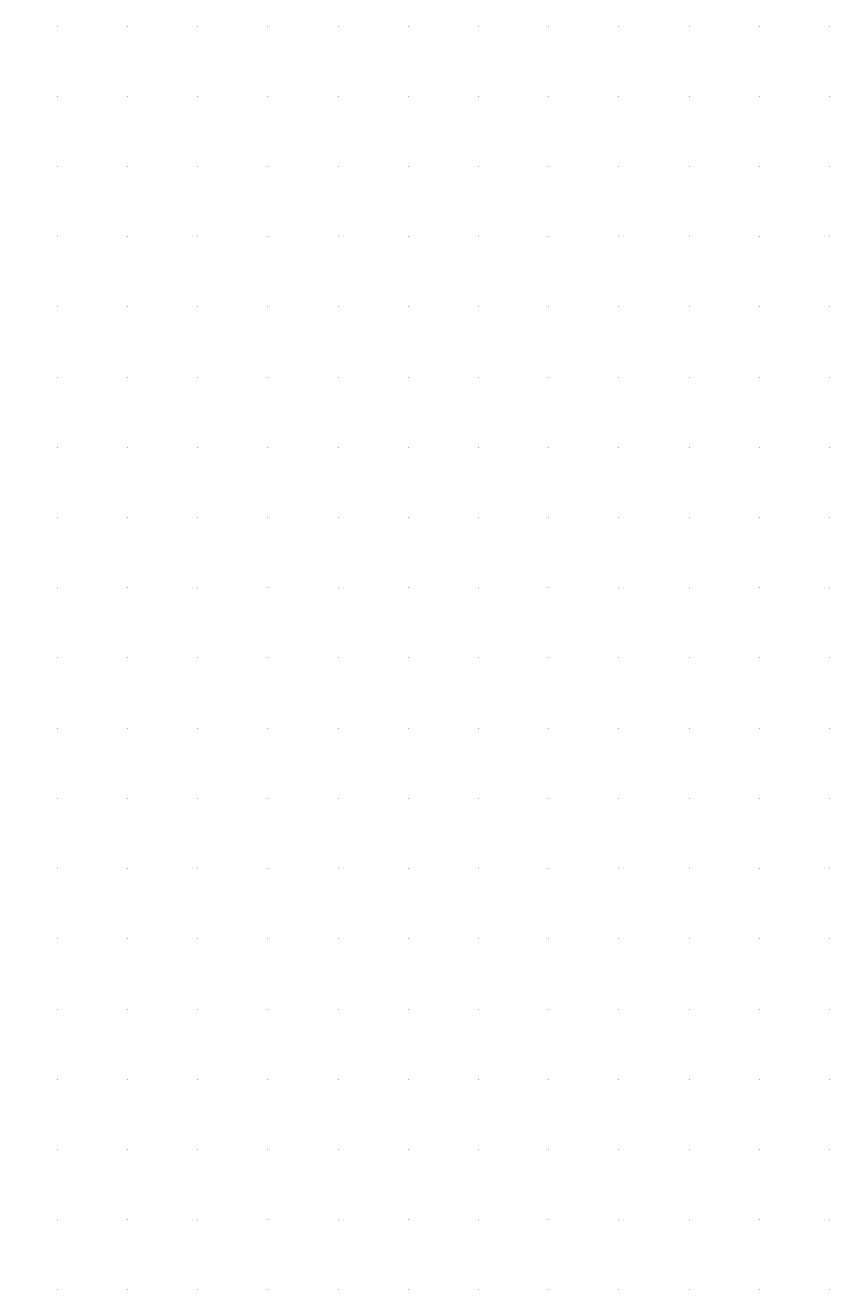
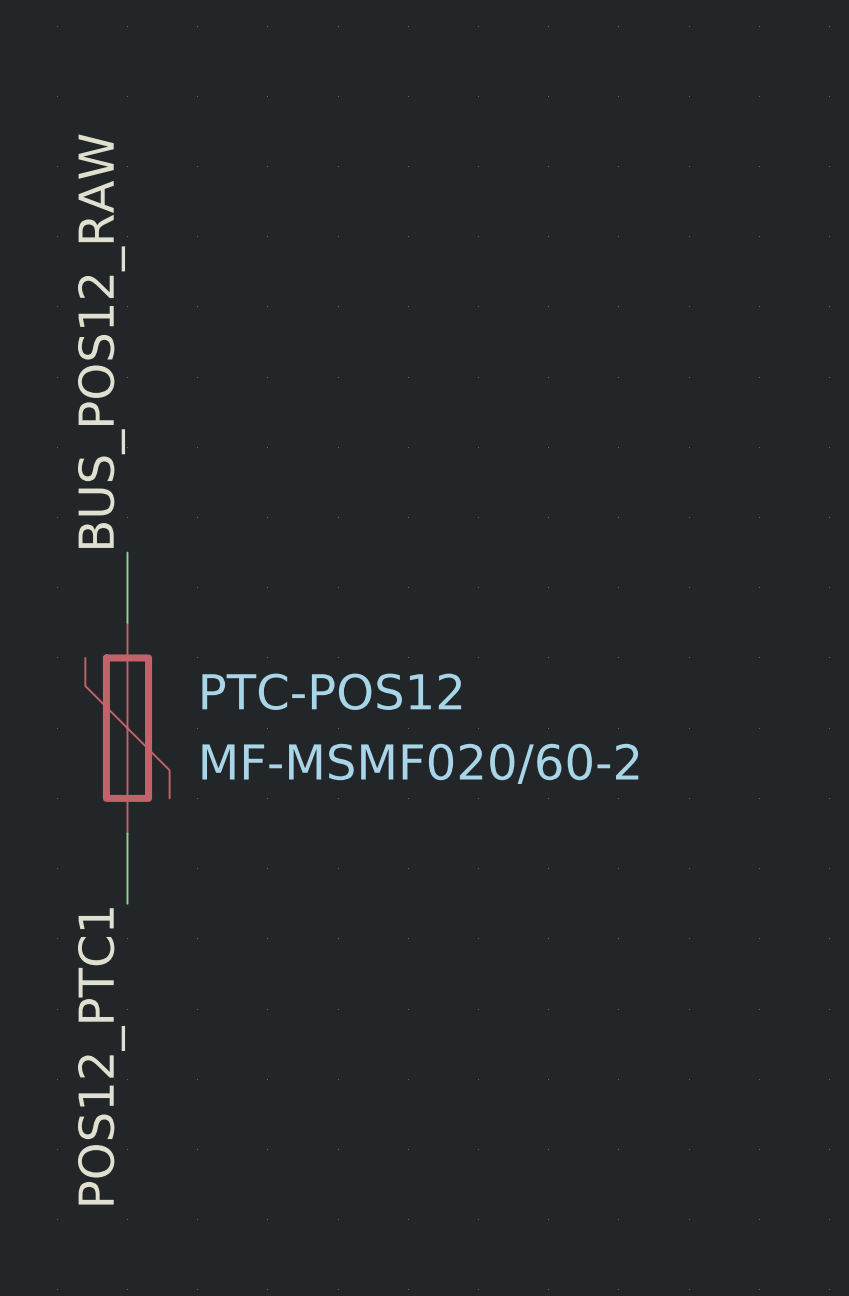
label: none -> BUS_POS12_RAW (101, 341)
wire: none -> (127, 552) (127, 622)
PTC-POS12: none -> MF-MSMF020/60-2 (127, 728)
wire: none -> (127, 833) (127, 903)
label: none -> POS12_PTC1 (101, 1056)

